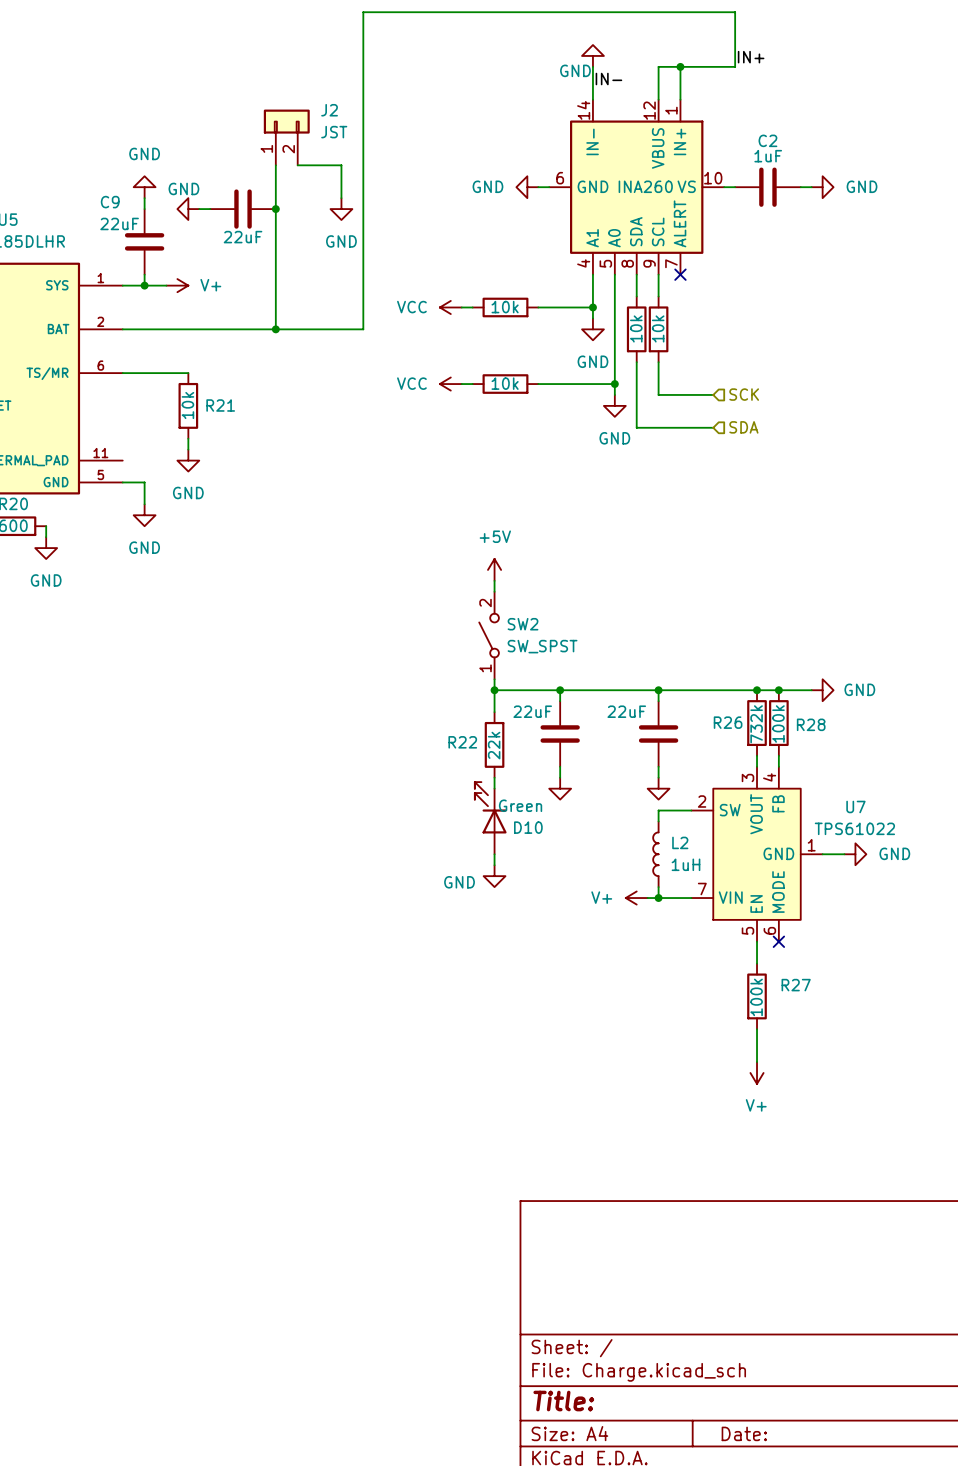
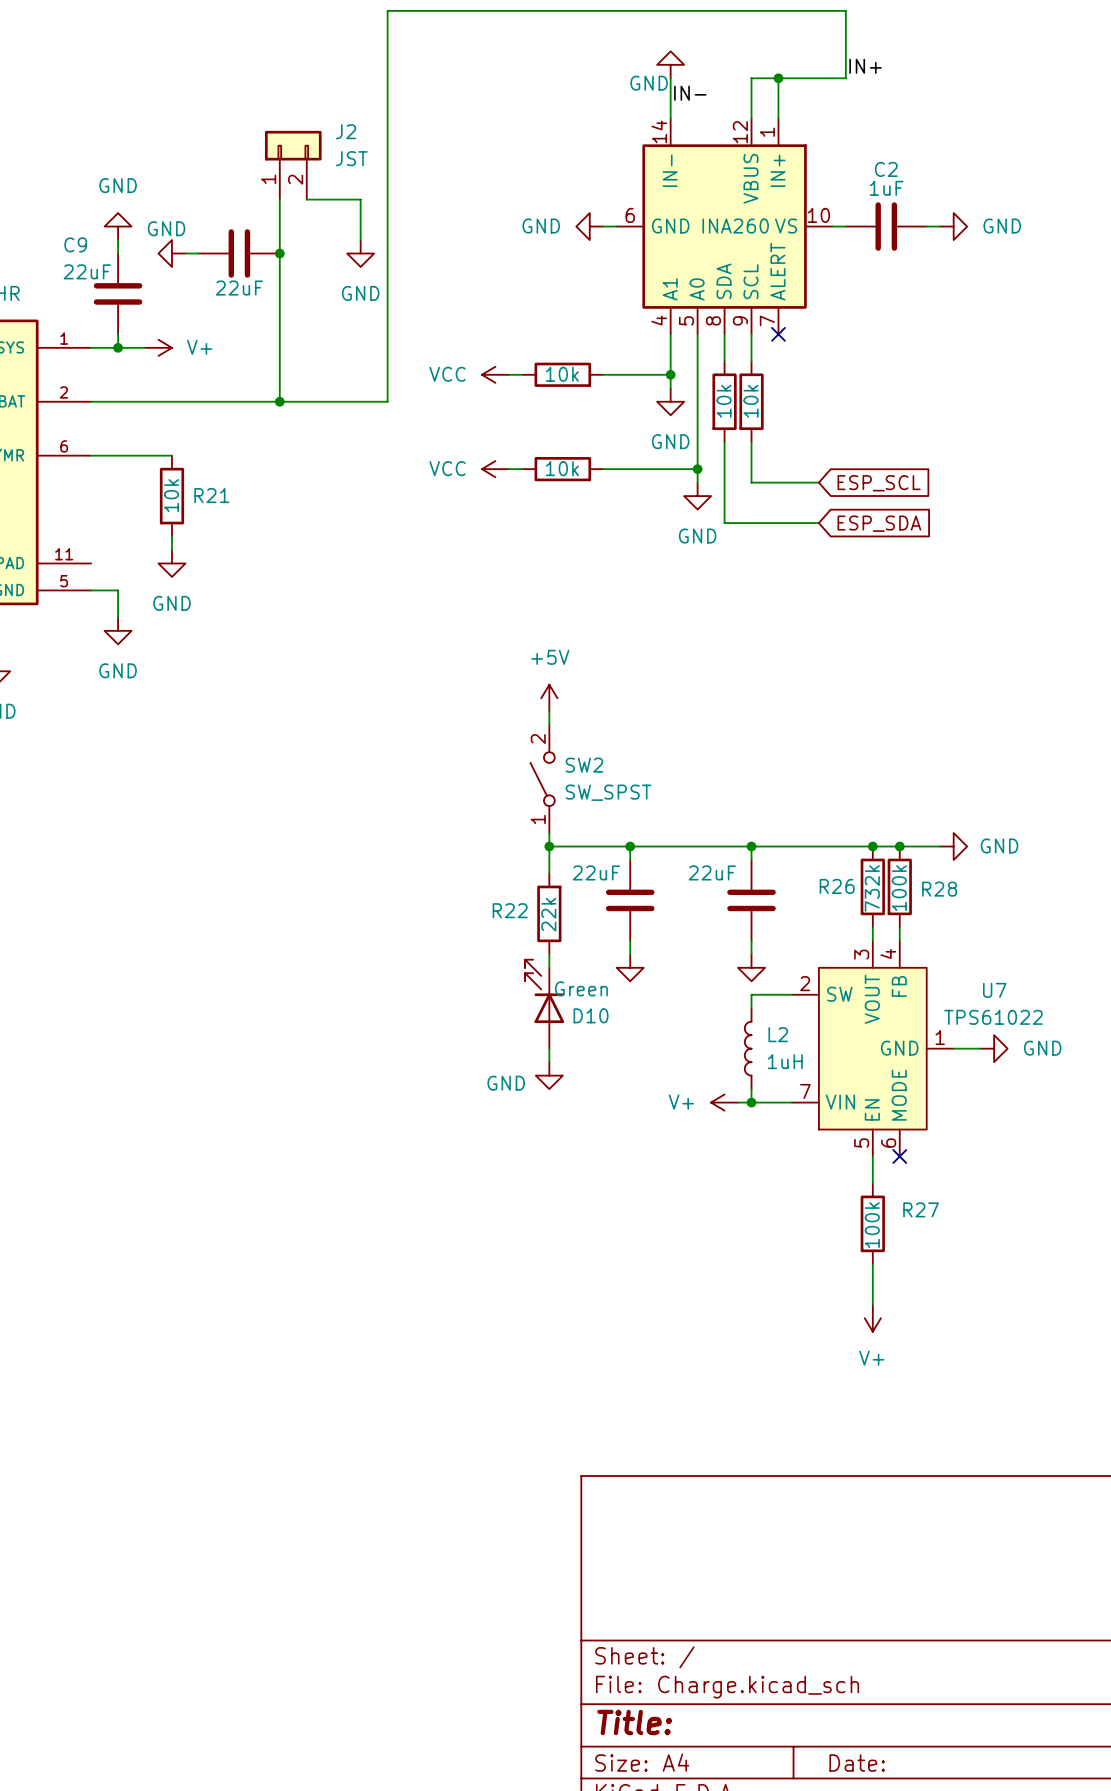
hierarchical label: SCK (744, 394) -> none
global label: none -> ESP_SCL (879, 483)
hierarchical label: SDA (743, 427) -> none
global label: none -> ESP_SDA (879, 523)

